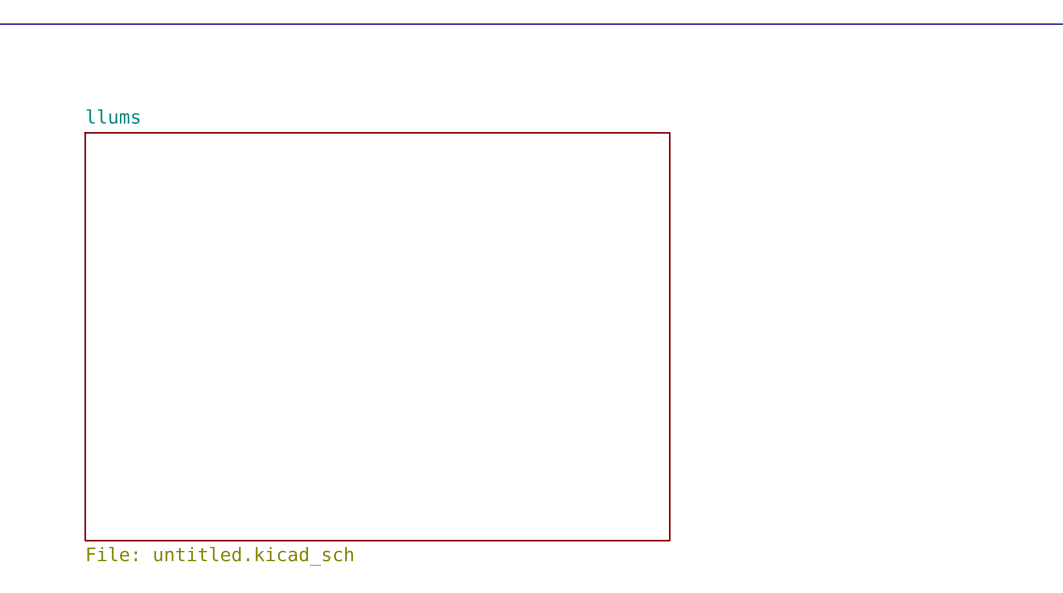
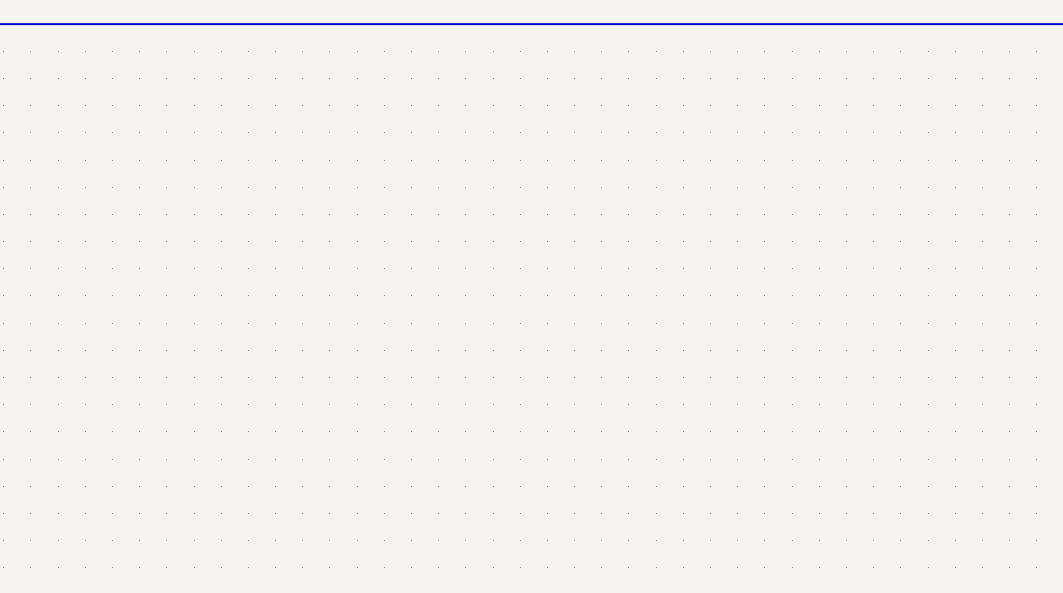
sheet llums: File: untitled.kicad_sch (377, 336) -> none

